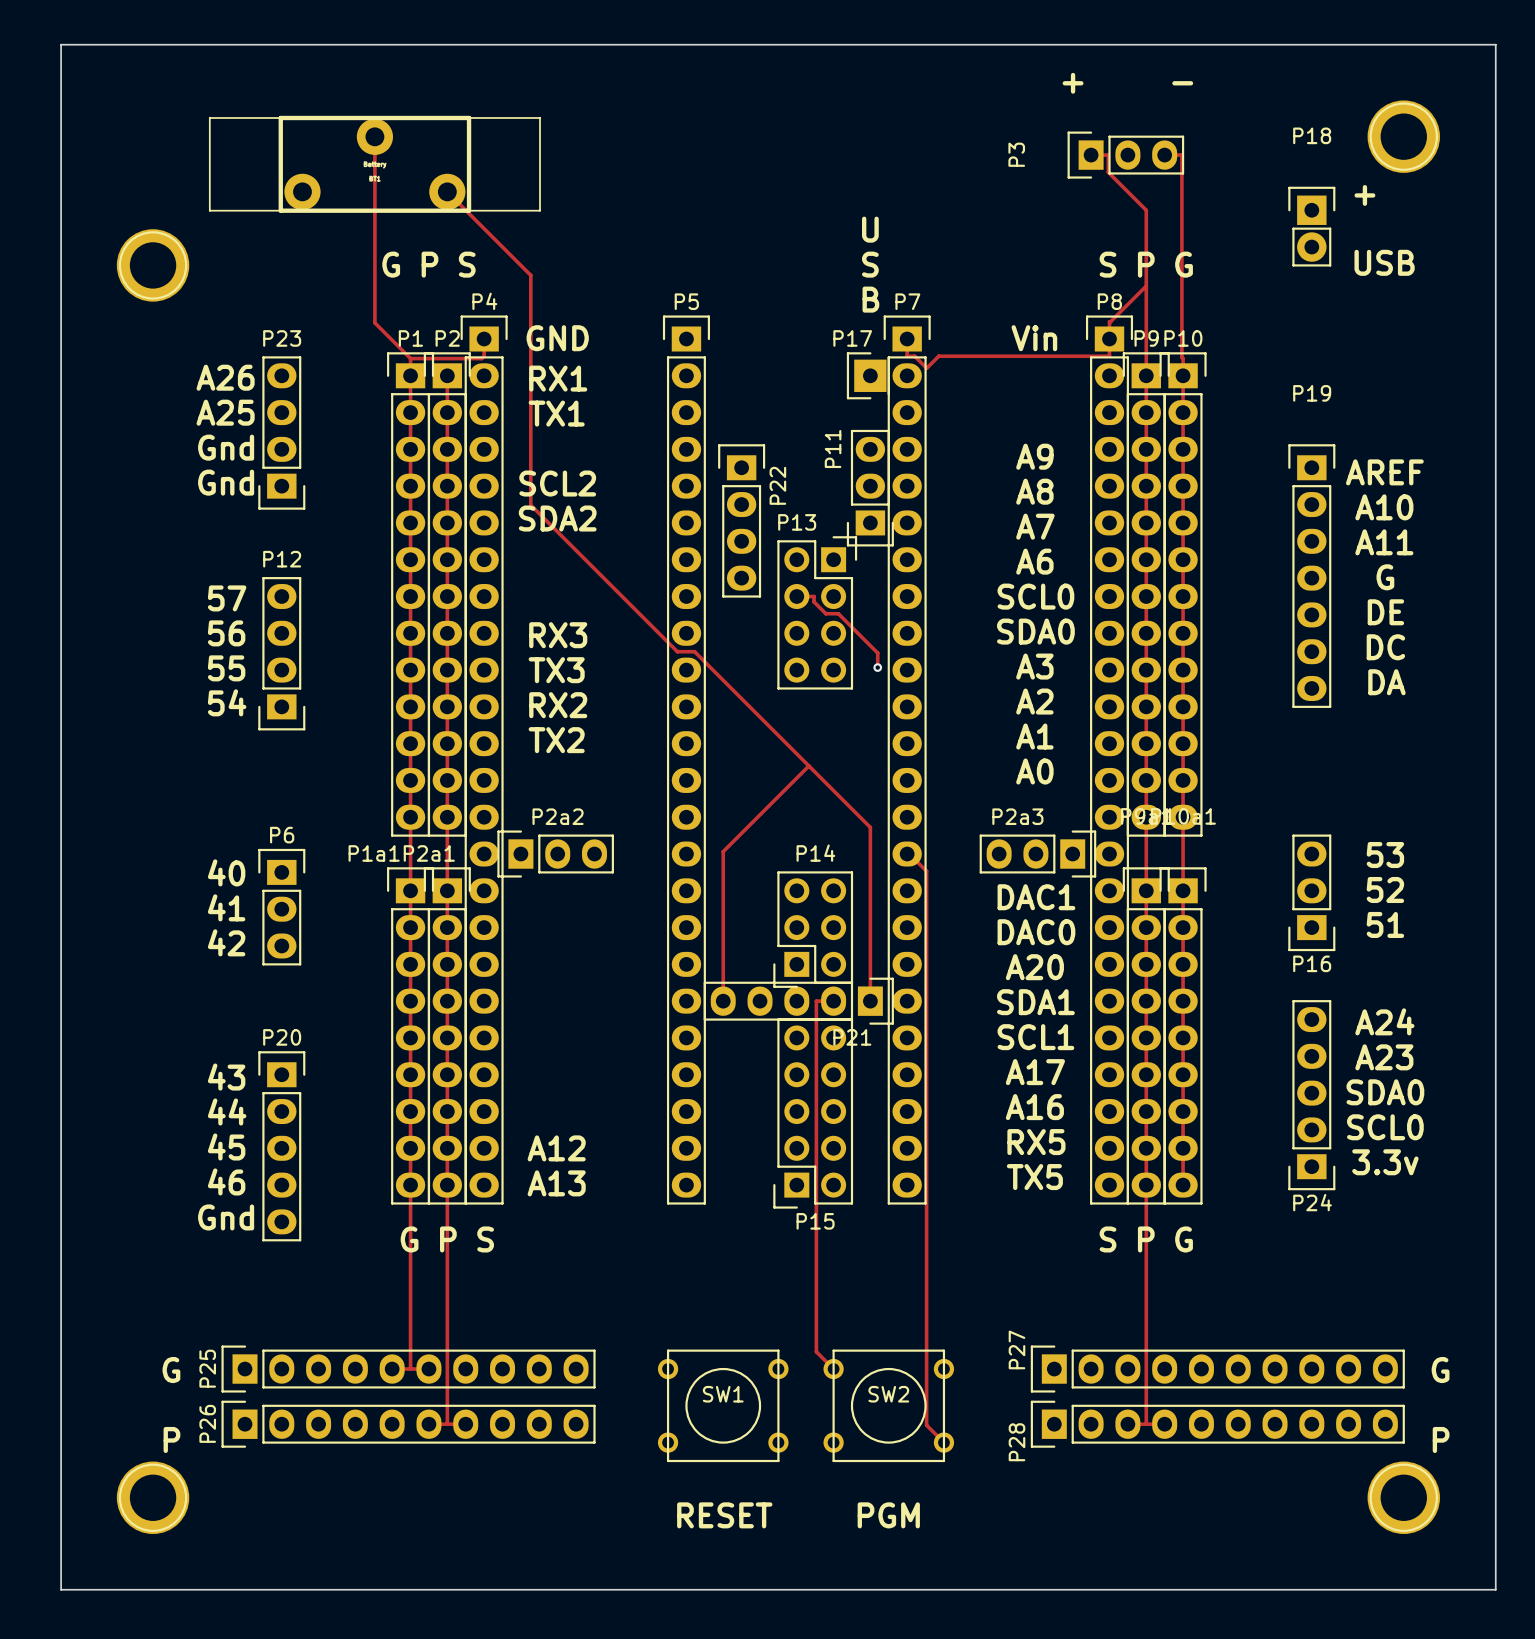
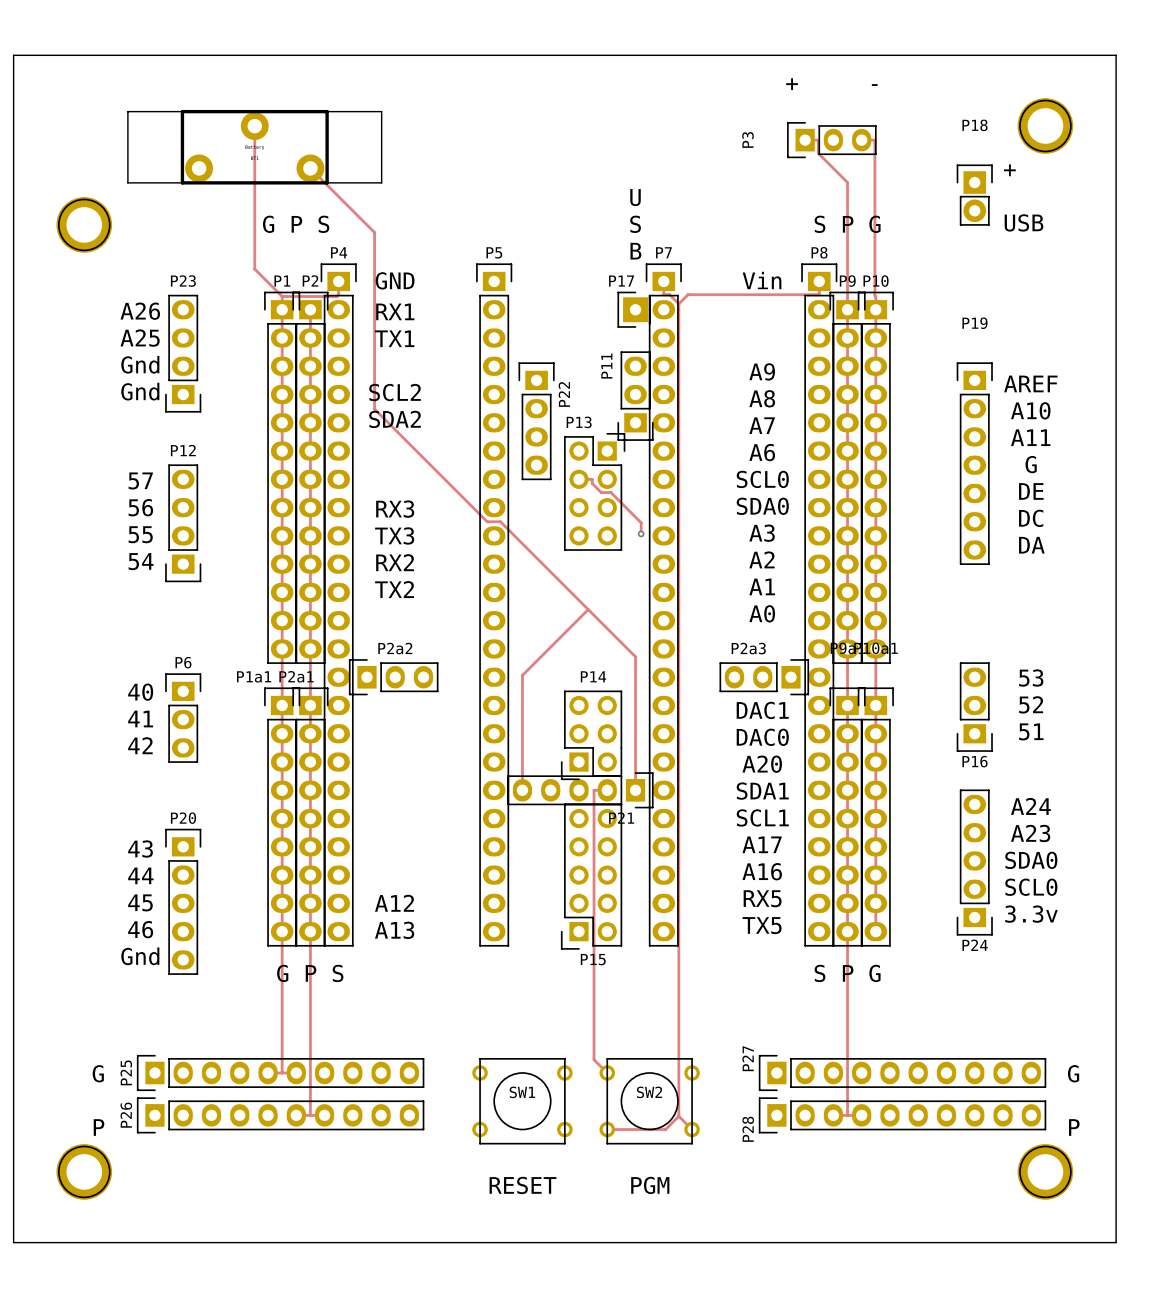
track: (1146, 286) (1109, 321) (1109, 339) -> none
track: none -> (678, 303) (678, 1116) (665, 1129) (607, 1129)
track: (907, 854) (926, 871) (926, 1425) -> none

